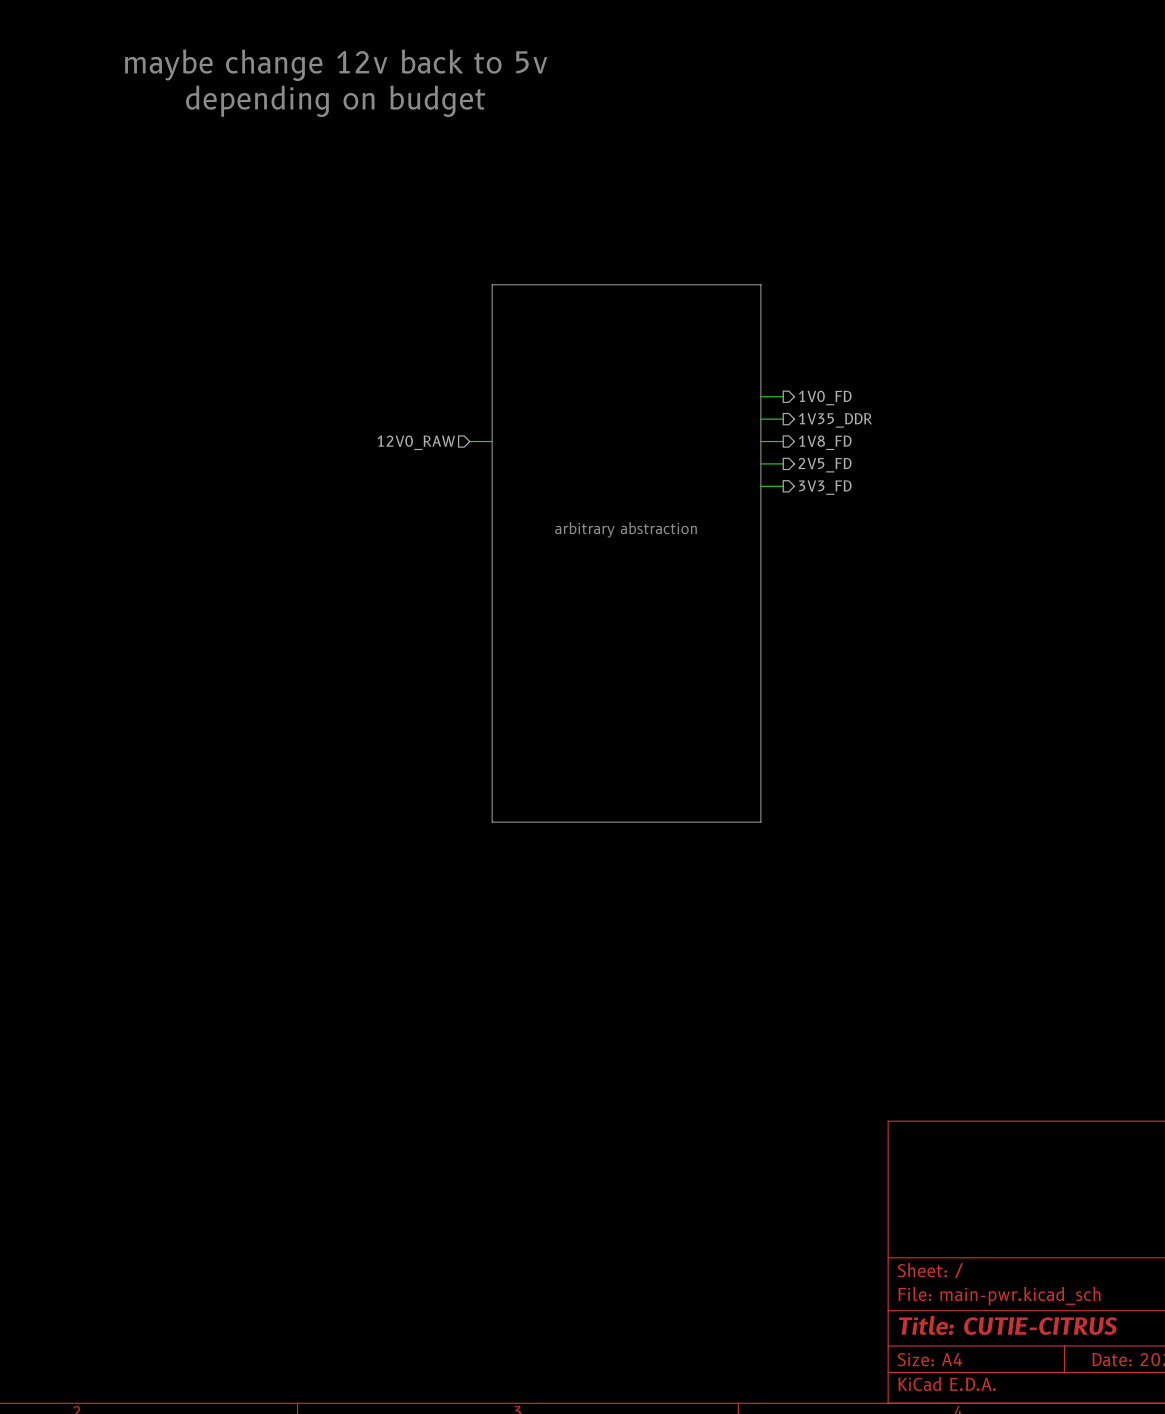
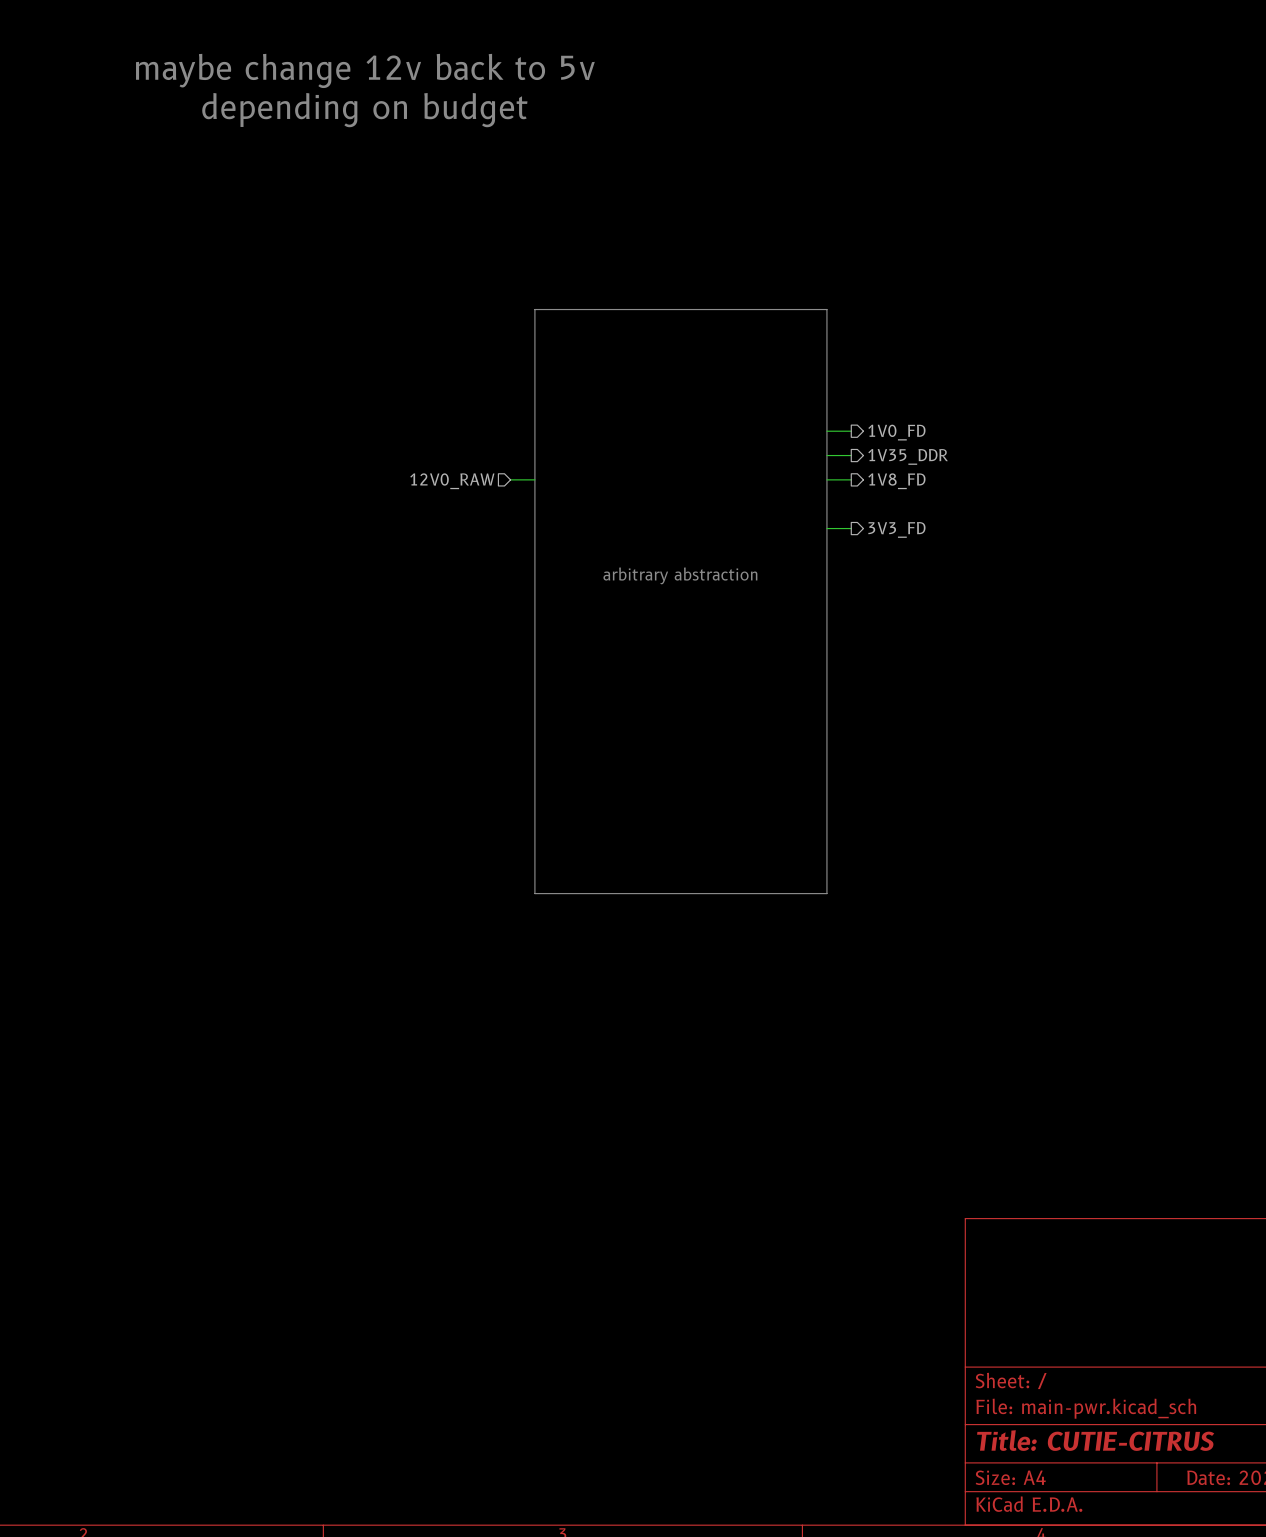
wire: (760, 463) (783, 463) -> none
hierarchical label: 2V5_FD (825, 465) -> none

